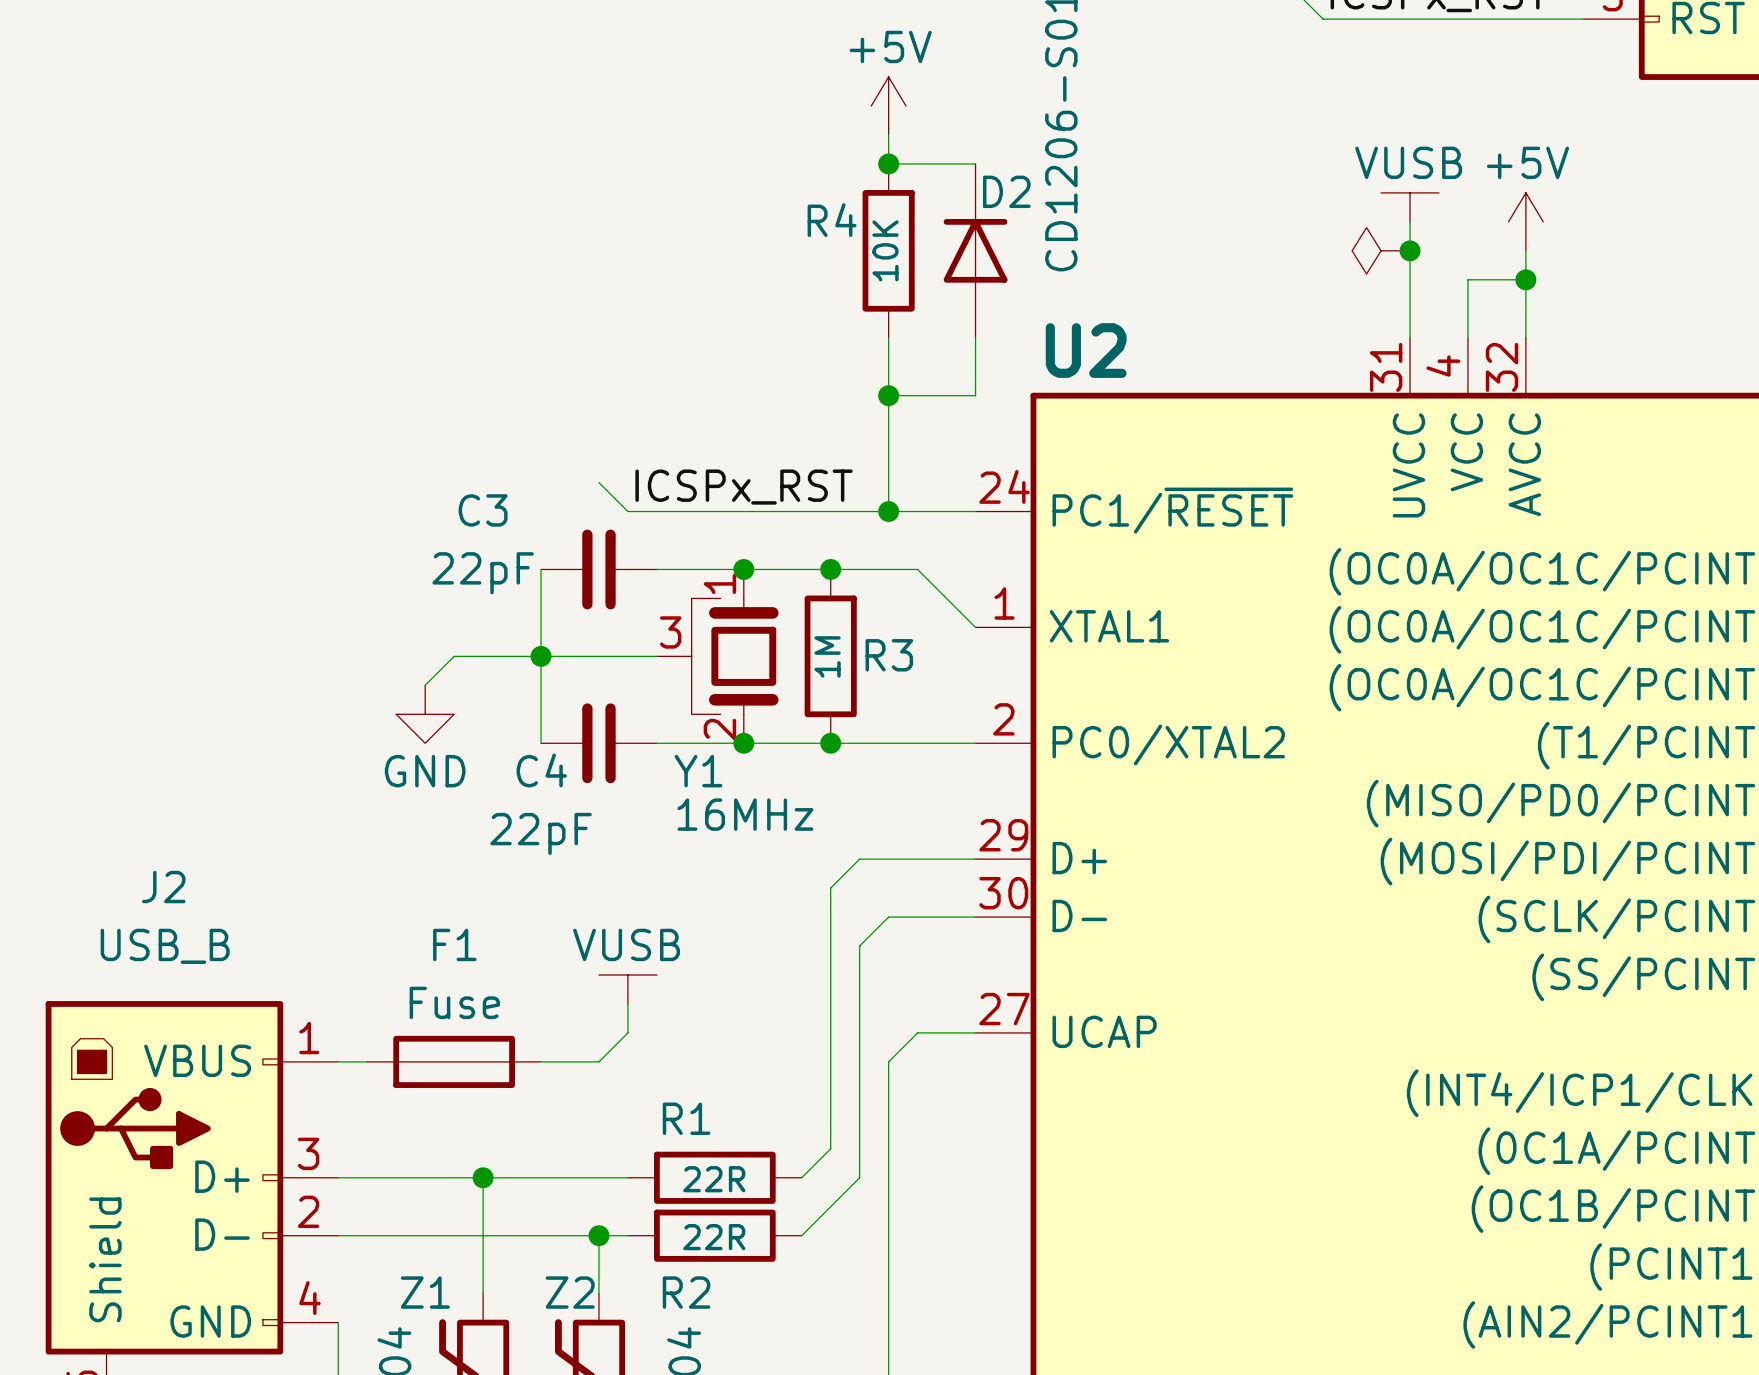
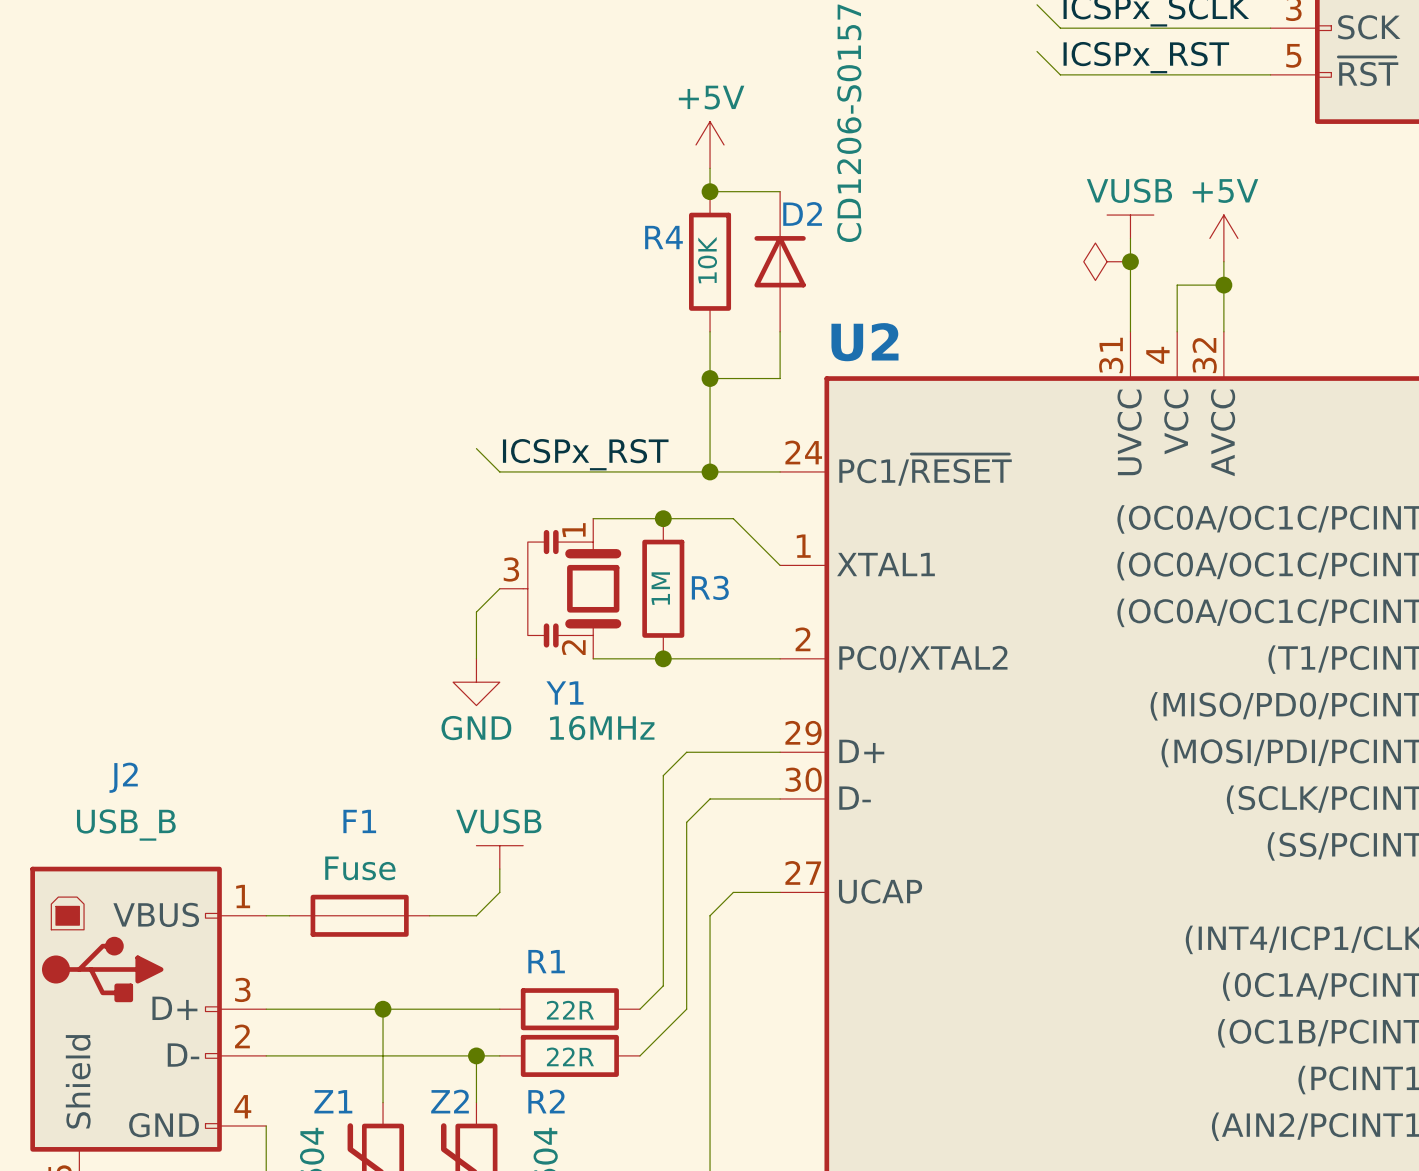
wire: (541, 569) (541, 743) -> none
C3: 22pF (598, 569) -> none
wire: (656, 569) (743, 569) -> none
Y1 symbol: [656, 569, 779, 744] -> [499, 518, 622, 659]
junction: (743, 569) -> none
junction: (541, 656) -> none
wire: none -> (499, 588) (476, 612) (476, 658)
wire: (656, 656) (454, 656) (425, 685) -> none
power symbol position: GND (425, 714) -> GND (476, 682)
C4: 22pF (598, 743) -> none
wire: (656, 743) (743, 743) -> none
junction: (743, 743) -> none

